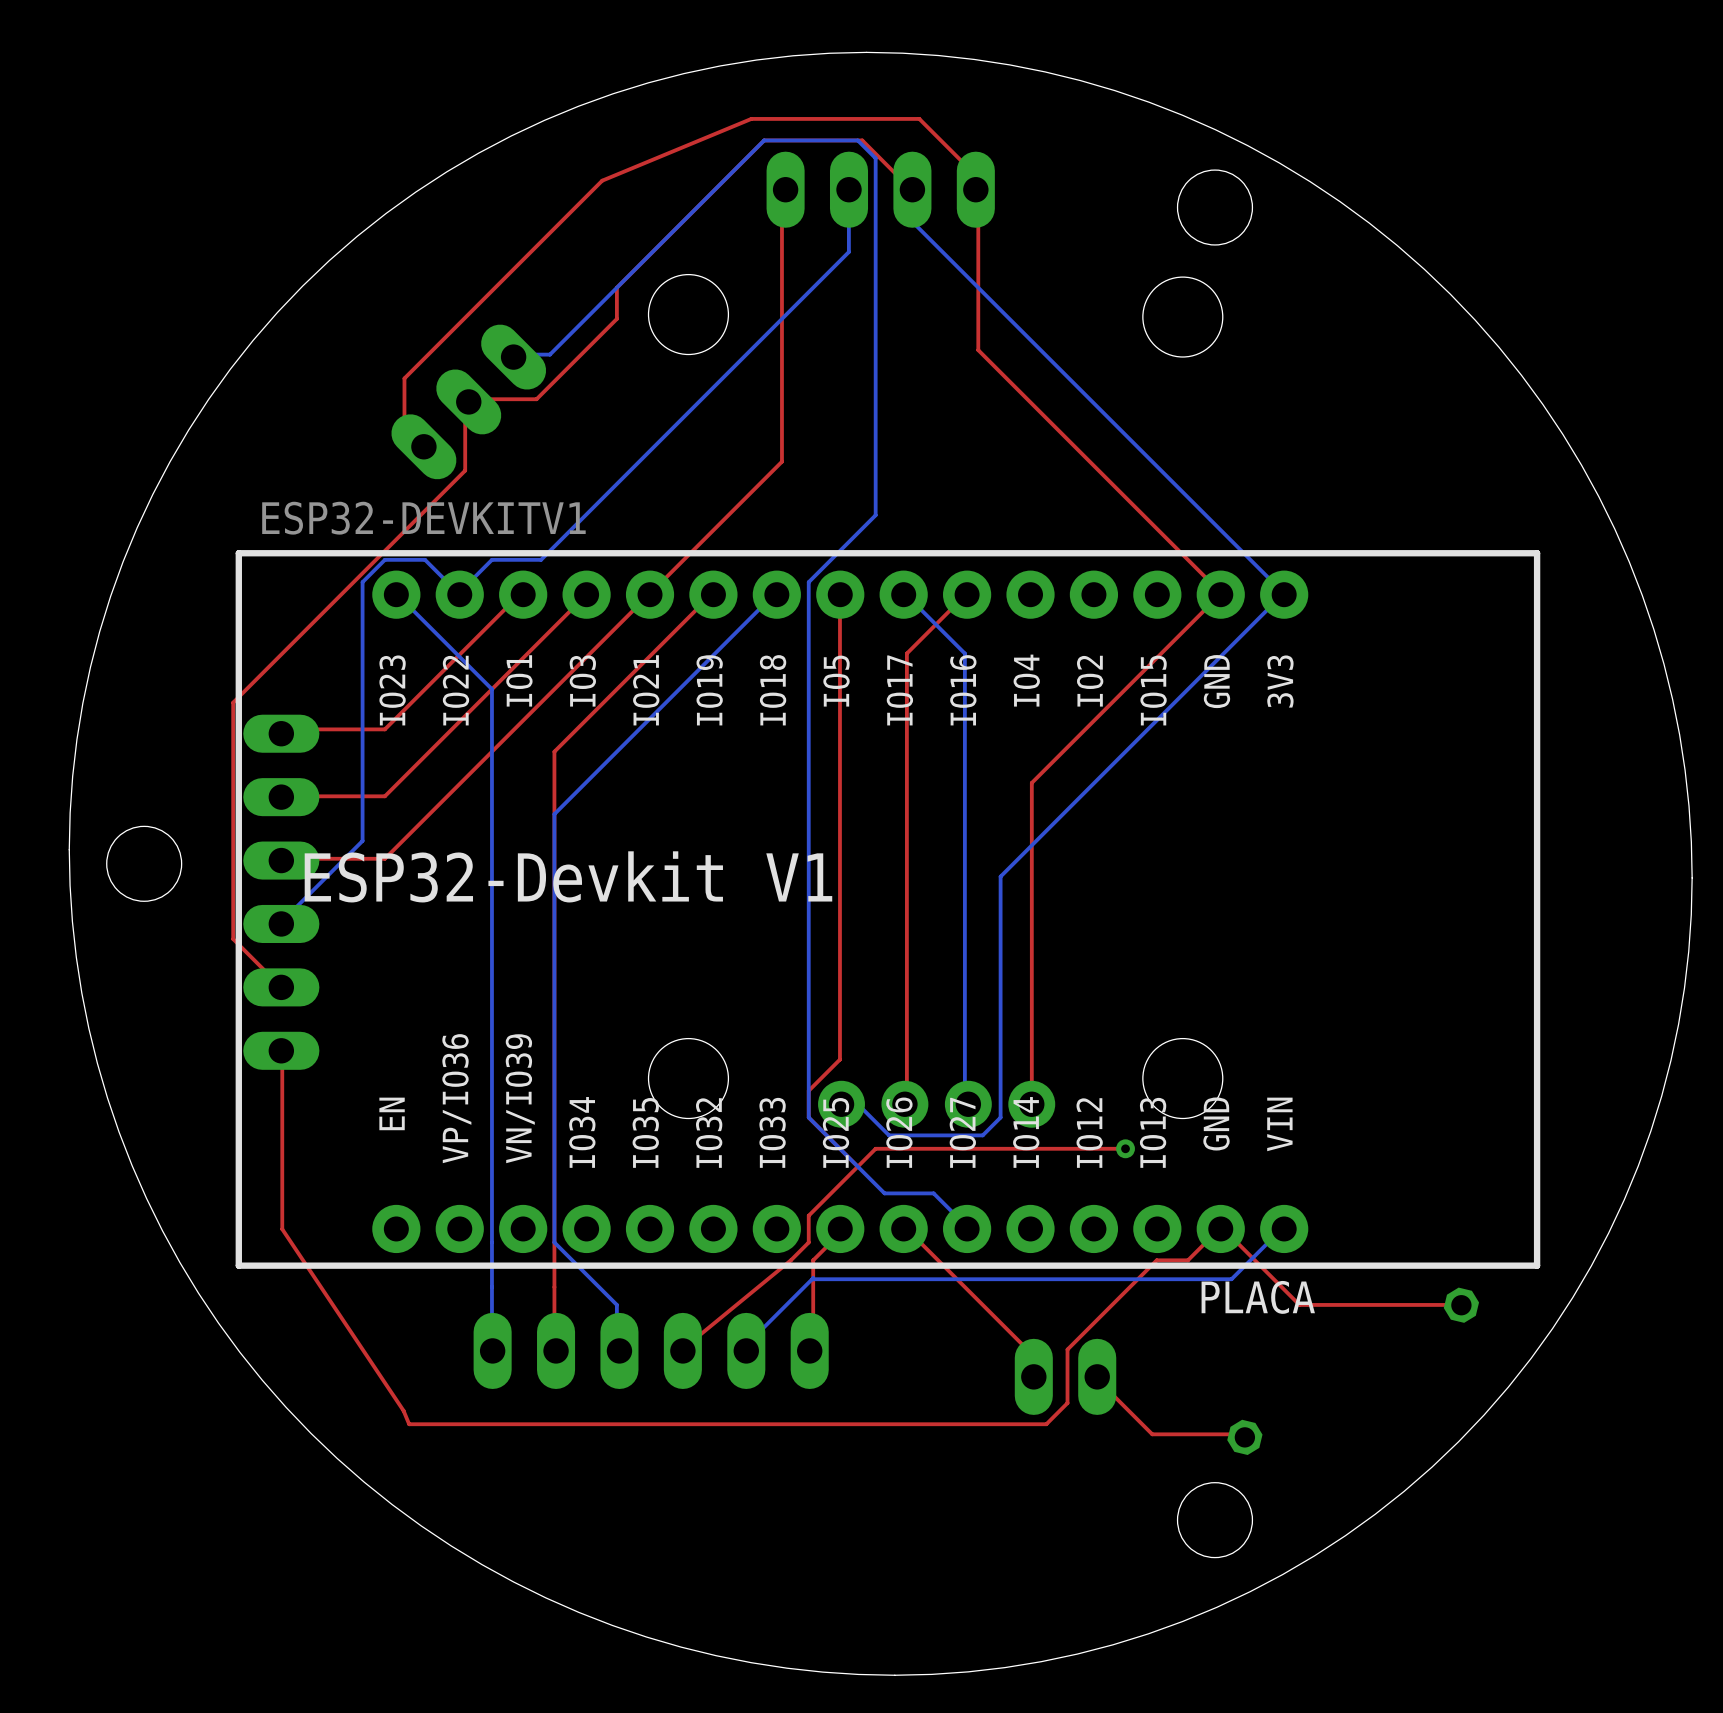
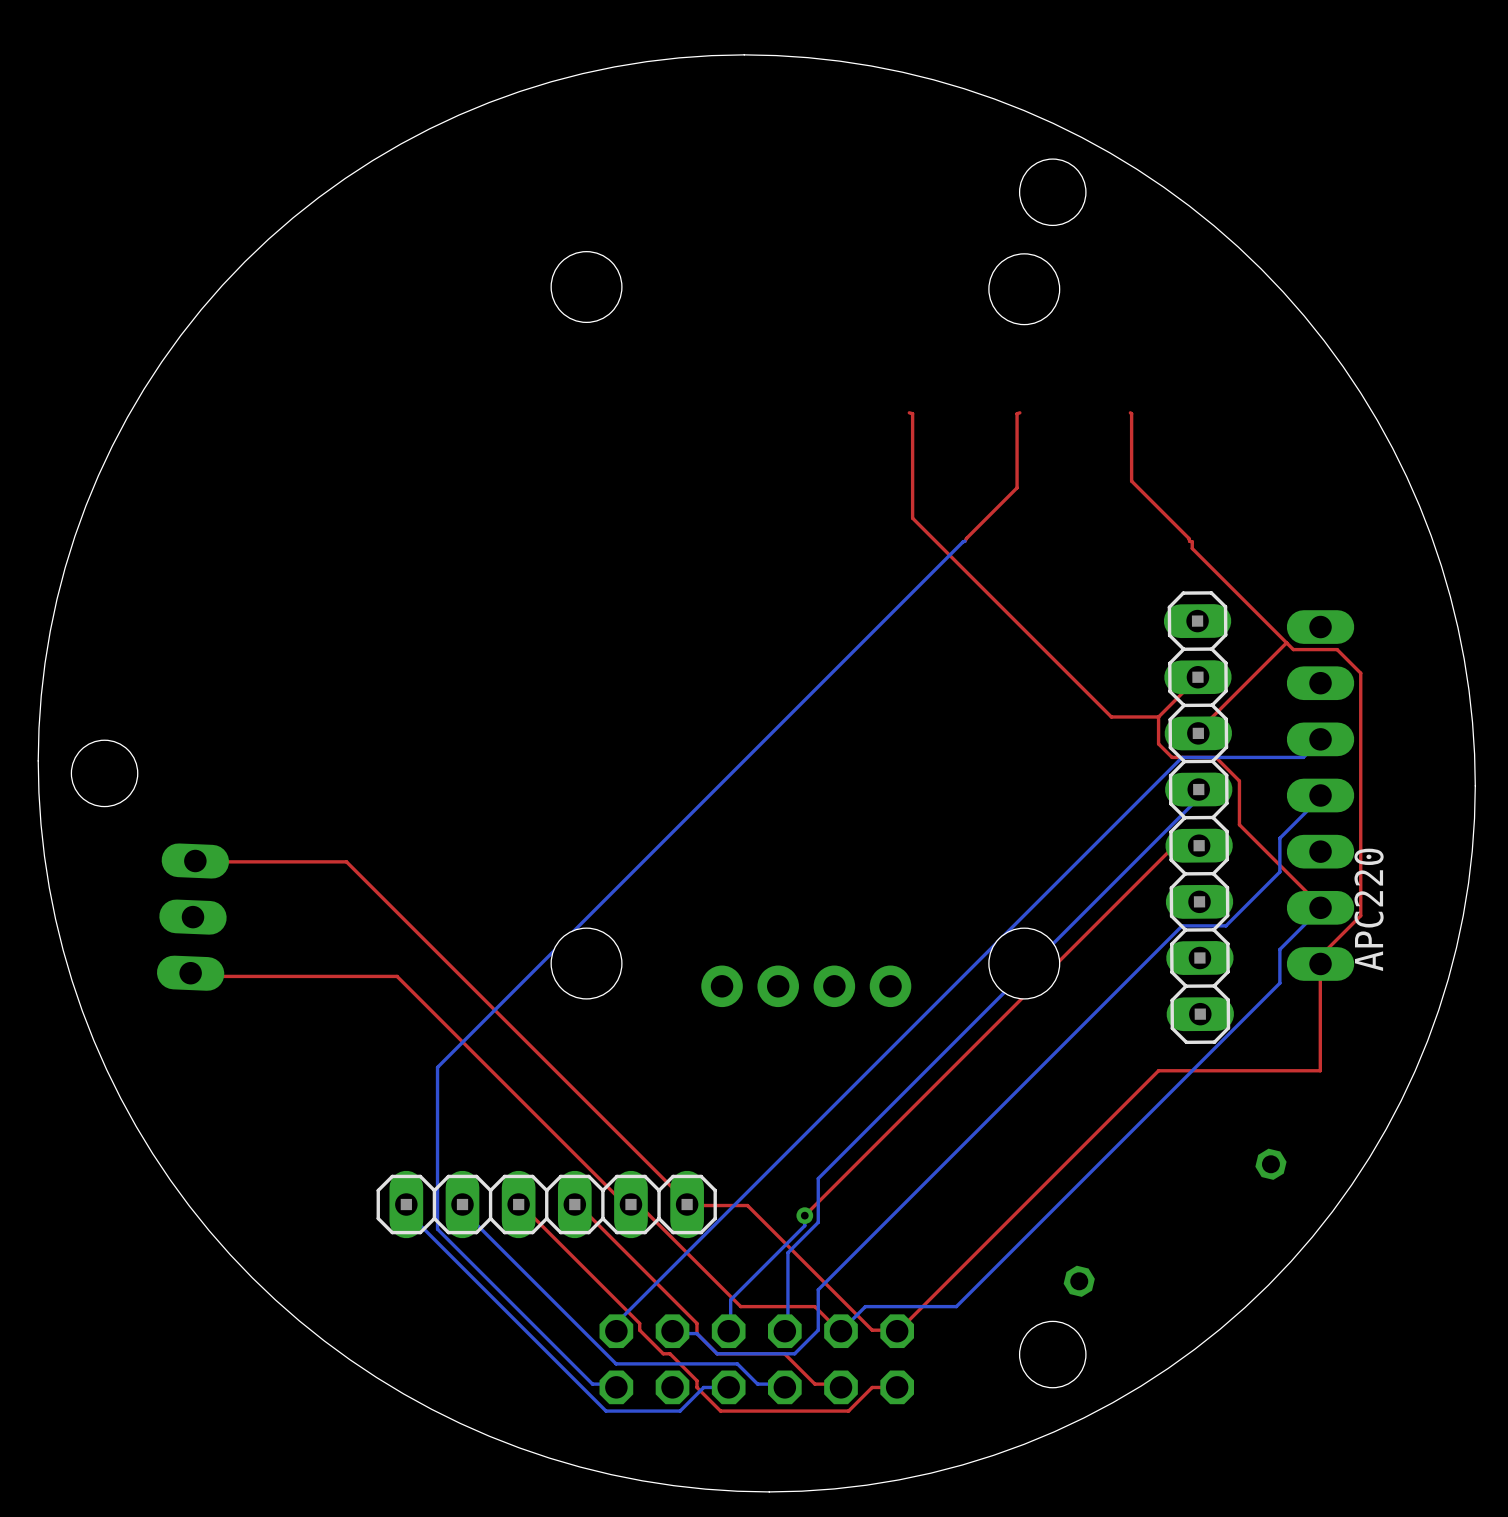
top track: (785, 189) (781, 193) (781, 461) (384, 858) (282, 858) (281, 860) -> none
bottom track: (849, 189) (848, 252) (541, 559) (491, 559) (460, 591) (459, 594) (425, 559) (384, 559) (362, 582) (362, 840) (281, 923) -> none
part: (880, 189) -> none
top track: (912, 189) (862, 140) (764, 140) (616, 287) (616, 318) (536, 399) (469, 399) (465, 403) (465, 470) (233, 702) (233, 939) (281, 987) -> none
bottom track: (912, 189) (915, 193) (915, 225) (1284, 594) (1000, 876) (1000, 1117) (982, 1135) (889, 1135) (862, 1108) (844, 1108) (841, 1104) -> none
bottom track: (513, 357) (514, 354) (549, 354) (764, 140) (857, 140) (875, 158) (875, 515) (808, 582) (808, 1117) (884, 1193) (933, 1193) (967, 1228) -> none
part: (468, 401) -> none
top track: (423, 446) (404, 427) (404, 378) (602, 180) (751, 118) (919, 118) (975, 175) (975, 189) (978, 193) (978, 350) (1220, 594) (1031, 782) (1031, 1104) -> none
top track: none -> (909, 412) (912, 413) (912, 518) (1111, 716) (1158, 716)
top track: none -> (1019, 412) (1017, 413) (1017, 487) (965, 541)
top track: none -> (1130, 412) (1131, 481) (1192, 541) (1192, 548) (1293, 649) (1337, 649) (1360, 673) (1360, 915) (1323, 952) (1323, 962) (1320, 963) (1320, 1070) (1158, 1070) (897, 1331) (872, 1330) (747, 1205) (687, 1204) (346, 861) (195, 861)
bottom track: (396, 594) (491, 689) (492, 1350) -> none
top track: (523, 594) (518, 595) (384, 729) (282, 729) (281, 733) -> none
top track: (586, 594) (384, 796) (281, 797) -> none
top track: (713, 594) (554, 751) (554, 1349) (556, 1350) -> none
bottom track: (776, 594) (773, 595) (554, 814) (554, 1242) (616, 1304) (616, 1349) (619, 1350) -> none
top track: (840, 594) (839, 1059) (808, 1090) (808, 1117) (857, 1166) -> none
bottom track: (903, 594) (906, 595) (964, 653) (964, 1104) (968, 1104) -> none
top track: (967, 594) (906, 653) (906, 1104) (904, 1104) -> none
bottom track: none -> (965, 541) (437, 1067) (437, 1229) (592, 1384) (616, 1384) (616, 1387)
top track: none -> (1286, 642) (1199, 730) (1198, 733)
top track: none -> (1197, 677) (1158, 716)
top track: none -> (1158, 716) (1158, 743) (1172, 757) (1215, 757) (1239, 781) (1239, 824) (1320, 907)
bottom track: none -> (1320, 739) (1303, 757) (1182, 757) (619, 1320) (619, 1330) (616, 1331)
bottom track: none -> (1198, 789) (1195, 791) (1195, 801) (818, 1178) (818, 1222) (787, 1252) (787, 1330) (784, 1331)
bottom track: none -> (1320, 795) (1279, 838) (1279, 871) (1225, 925) (1182, 925) (818, 1289) (818, 1330) (794, 1353) (717, 1353) (696, 1333) (673, 1333) (672, 1331)
APC220: none -> (1320, 795)
part: (281, 892) -> none
PLACA: (887, 909) -> none
part: none -> (1198, 817)
top track: none -> (1199, 845) (1199, 848) (1172, 848) (804, 1215)
bottom track: none -> (1320, 907) (1279, 949) (1279, 983) (956, 1306) (865, 1306) (841, 1331)
part: none -> (193, 917)
top track: (281, 1050) (282, 1229) (403, 1410) (409, 1424) (1046, 1424) (1067, 1403) (1067, 1349) (1156, 1260) (1187, 1260) (1219, 1229) (1223, 1229) (1299, 1304) (1461, 1305) -> none
top track: none -> (190, 973) (191, 976) (397, 976) (622, 1202) (639, 1205) (740, 1306) (814, 1306) (841, 1333)
top track: (1125, 1148) (875, 1148) (808, 1215) (808, 1242) (790, 1260) (682, 1350) -> none
via: (1125, 1148) -> none
top track: (903, 1228) (906, 1229) (1031, 1354) (1031, 1376) (1033, 1376) -> none
bottom track: (1284, 1228) (1281, 1229) (1231, 1279) (812, 1279) -> none
top track: (840, 1233) (840, 1228) (839, 1233) (813, 1260) (813, 1349) (809, 1350) -> none
bottom track: (813, 1279) (750, 1340) (750, 1349) (746, 1350) -> none
bottom track: none -> (406, 1204) (407, 1212) (606, 1411) (680, 1411) (703, 1387) (728, 1387)
bottom track: none -> (462, 1204) (464, 1205) (464, 1212) (616, 1363) (737, 1363) (757, 1384) (784, 1384) (784, 1387)
top track: none -> (518, 1204) (639, 1323) (639, 1330) (663, 1353) (670, 1353) (696, 1380) (696, 1387) (720, 1411) (848, 1411) (872, 1387) (897, 1387)
part side: top (651, 1350) -> bottom (546, 1204)
top track: none -> (574, 1204) (575, 1202) (696, 1323) (696, 1333) (717, 1353) (784, 1353) (814, 1384) (838, 1384) (841, 1387)
bottom track: none -> (804, 1215) (804, 1225) (730, 1299) (730, 1330) (728, 1331)
via: none -> (804, 1215)
part: (1065, 1376) -> none
top track: (1097, 1376) (1098, 1380) (1152, 1434) (1241, 1434) (1244, 1437) -> none
part: none -> (756, 1359)

